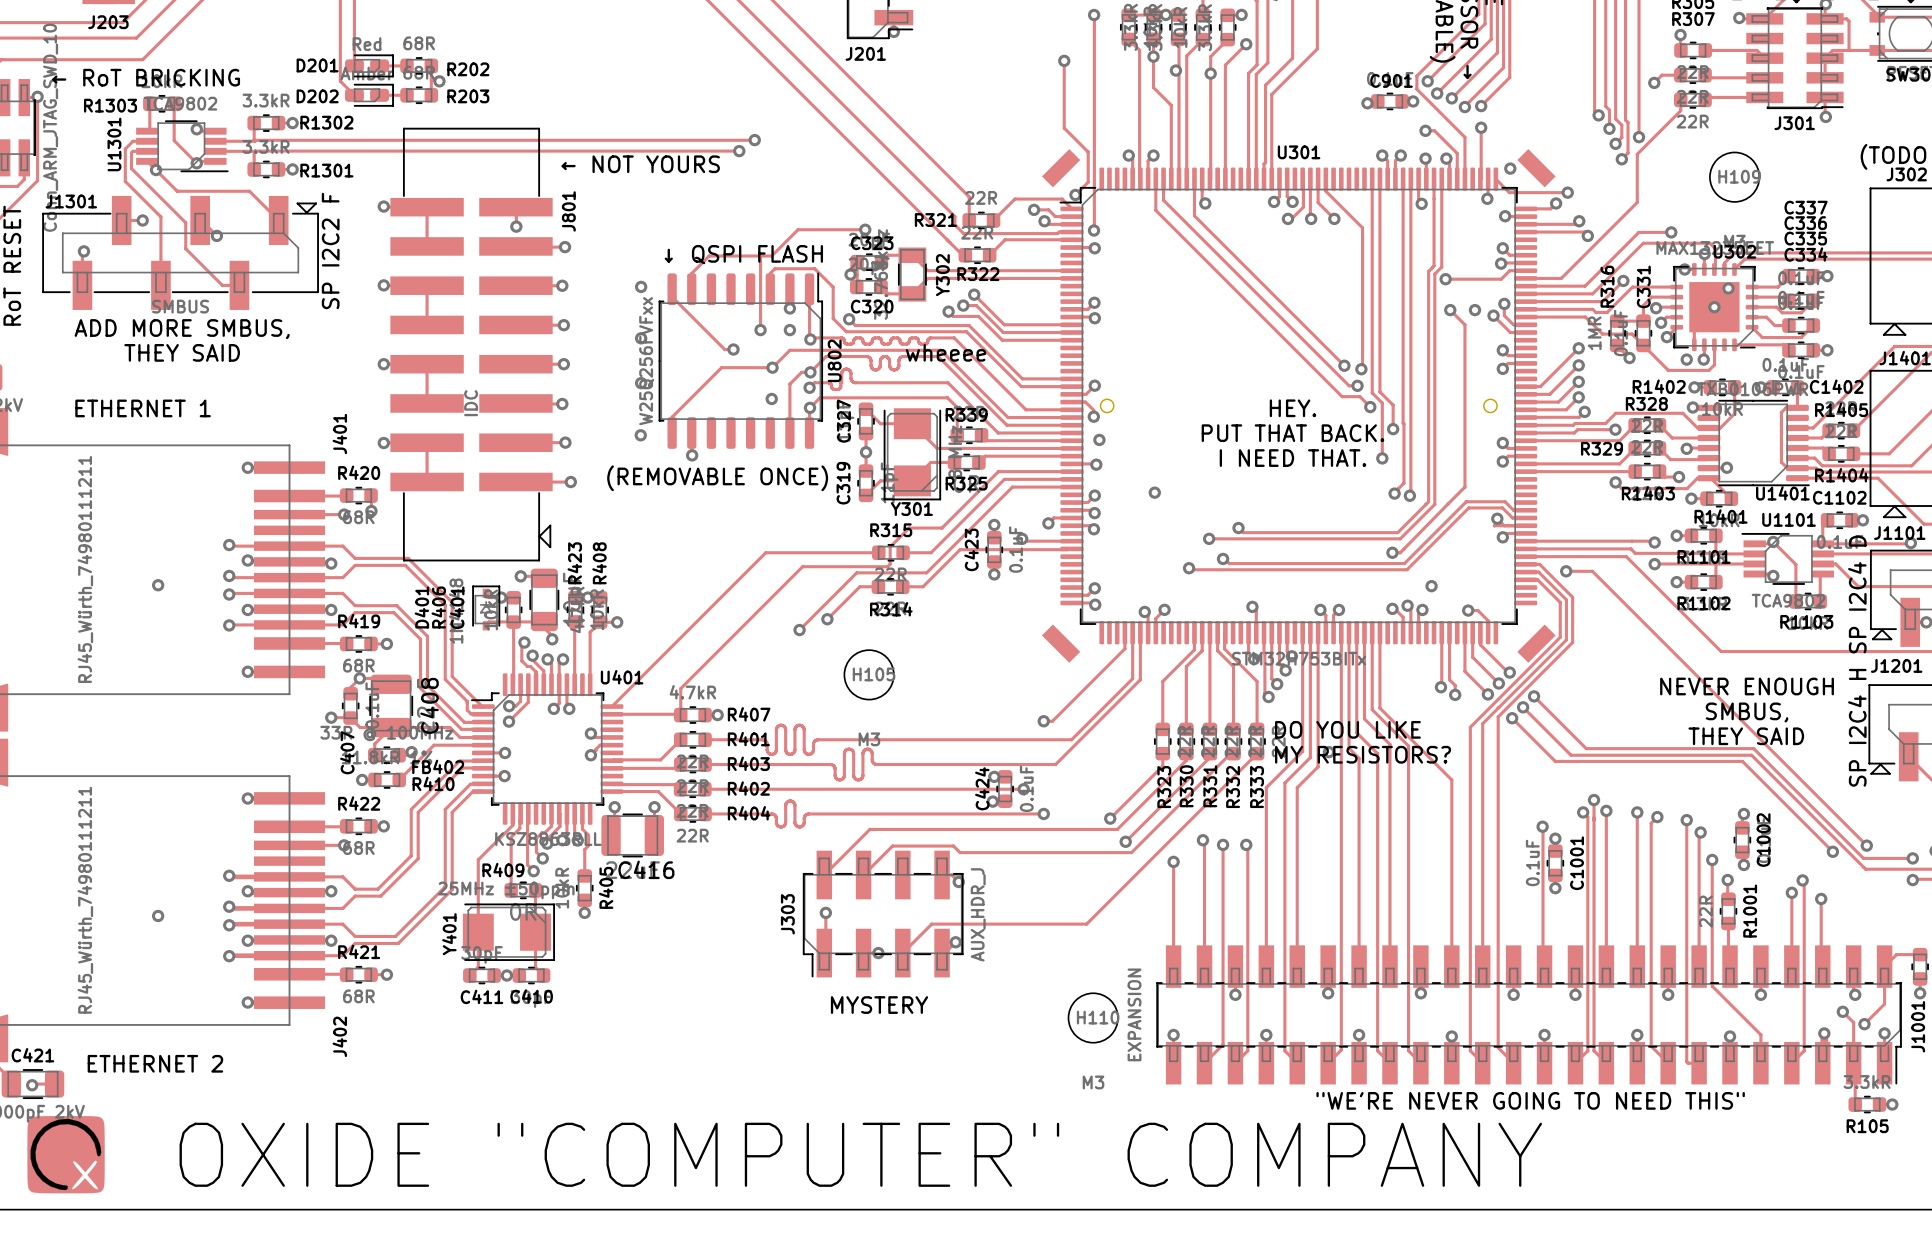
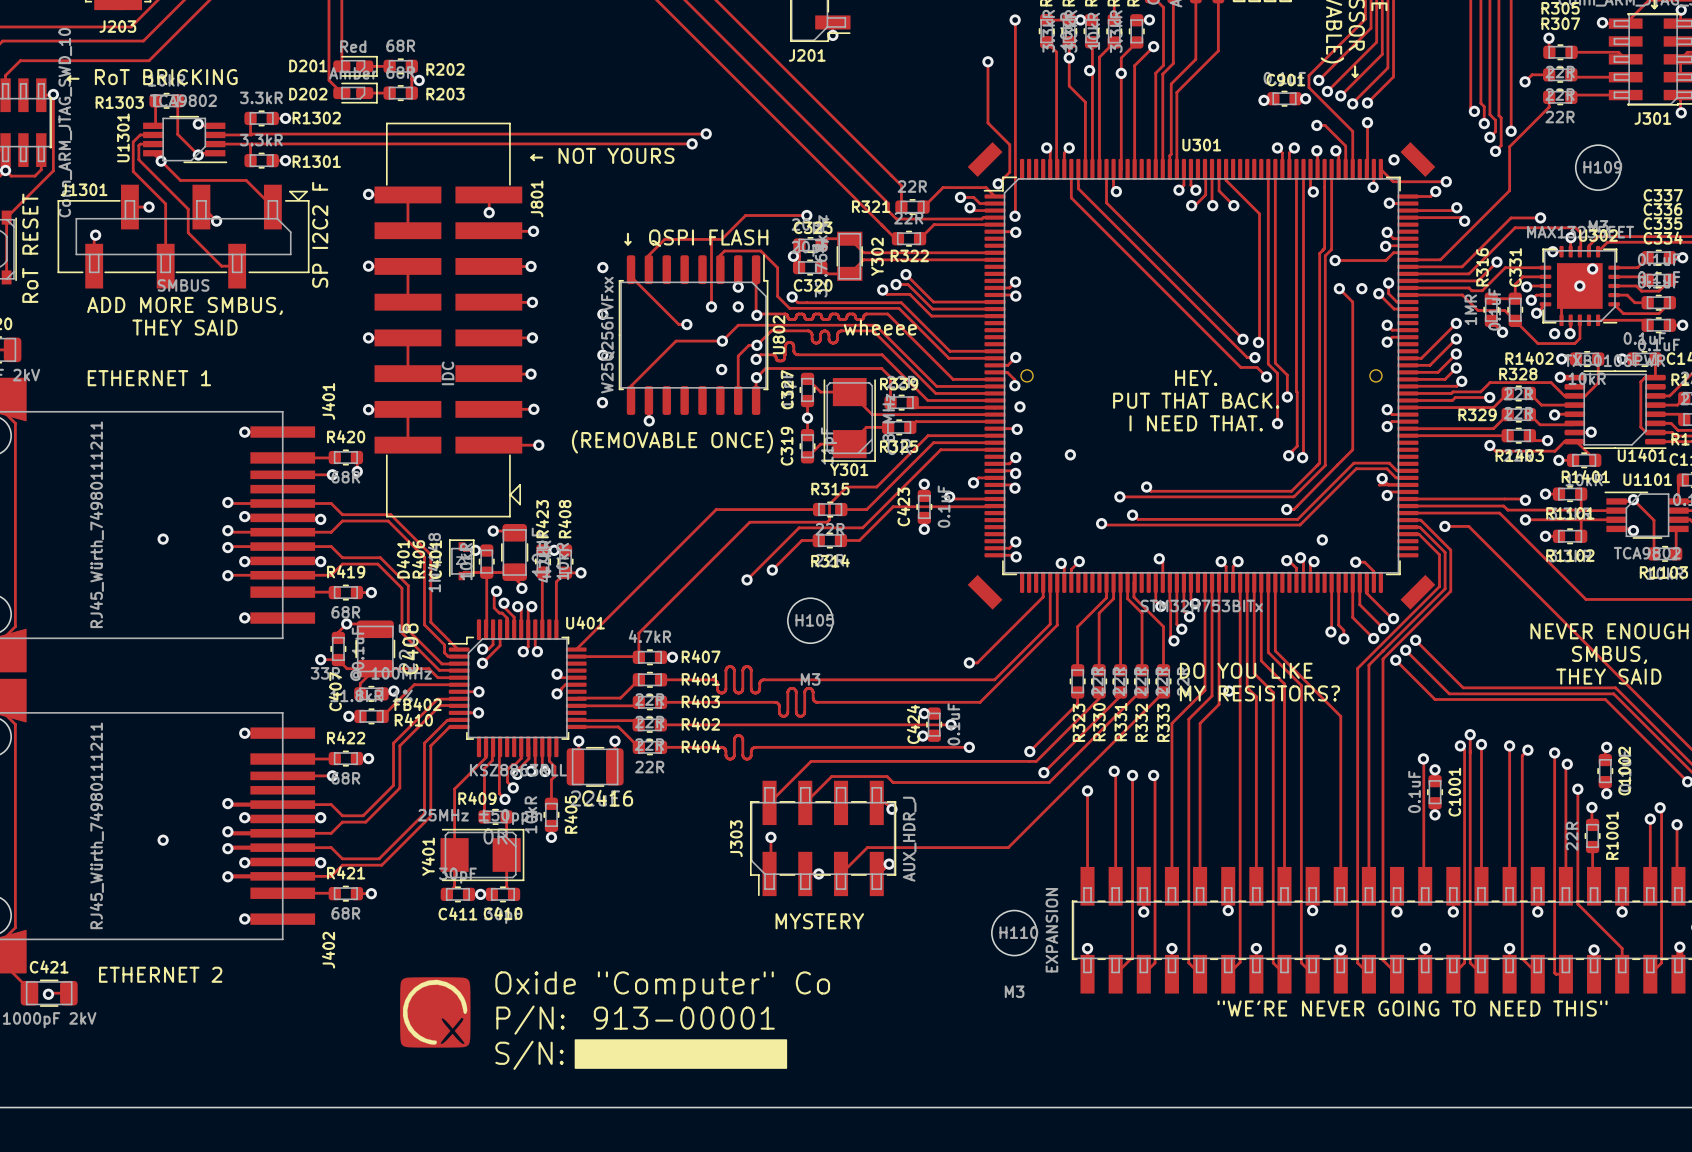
drawing: none -> [400, 977, 788, 1069]
drawing: [27, 1115, 105, 1194] -> none
text: OXIDE "COMPUTER" COMPANY (860, 1154) -> none

